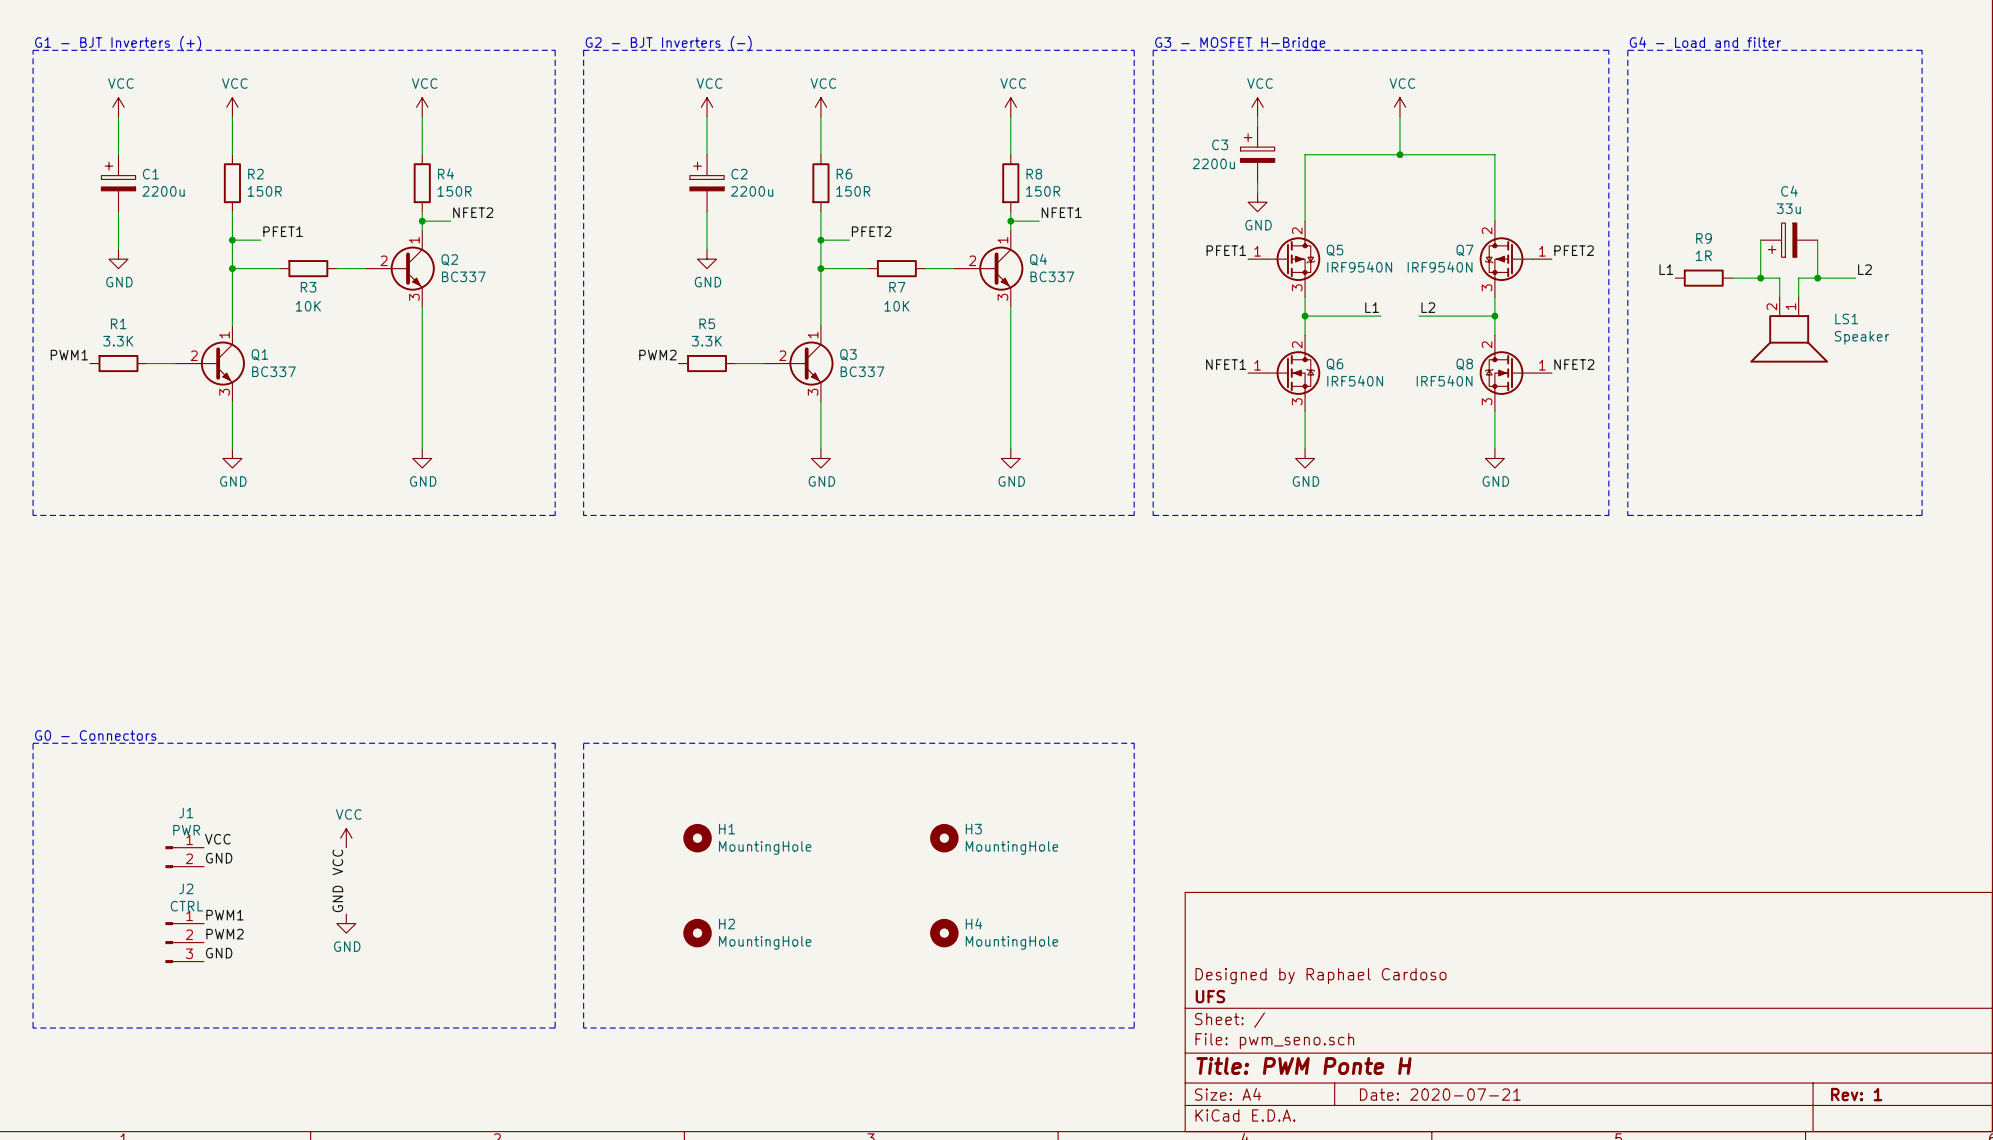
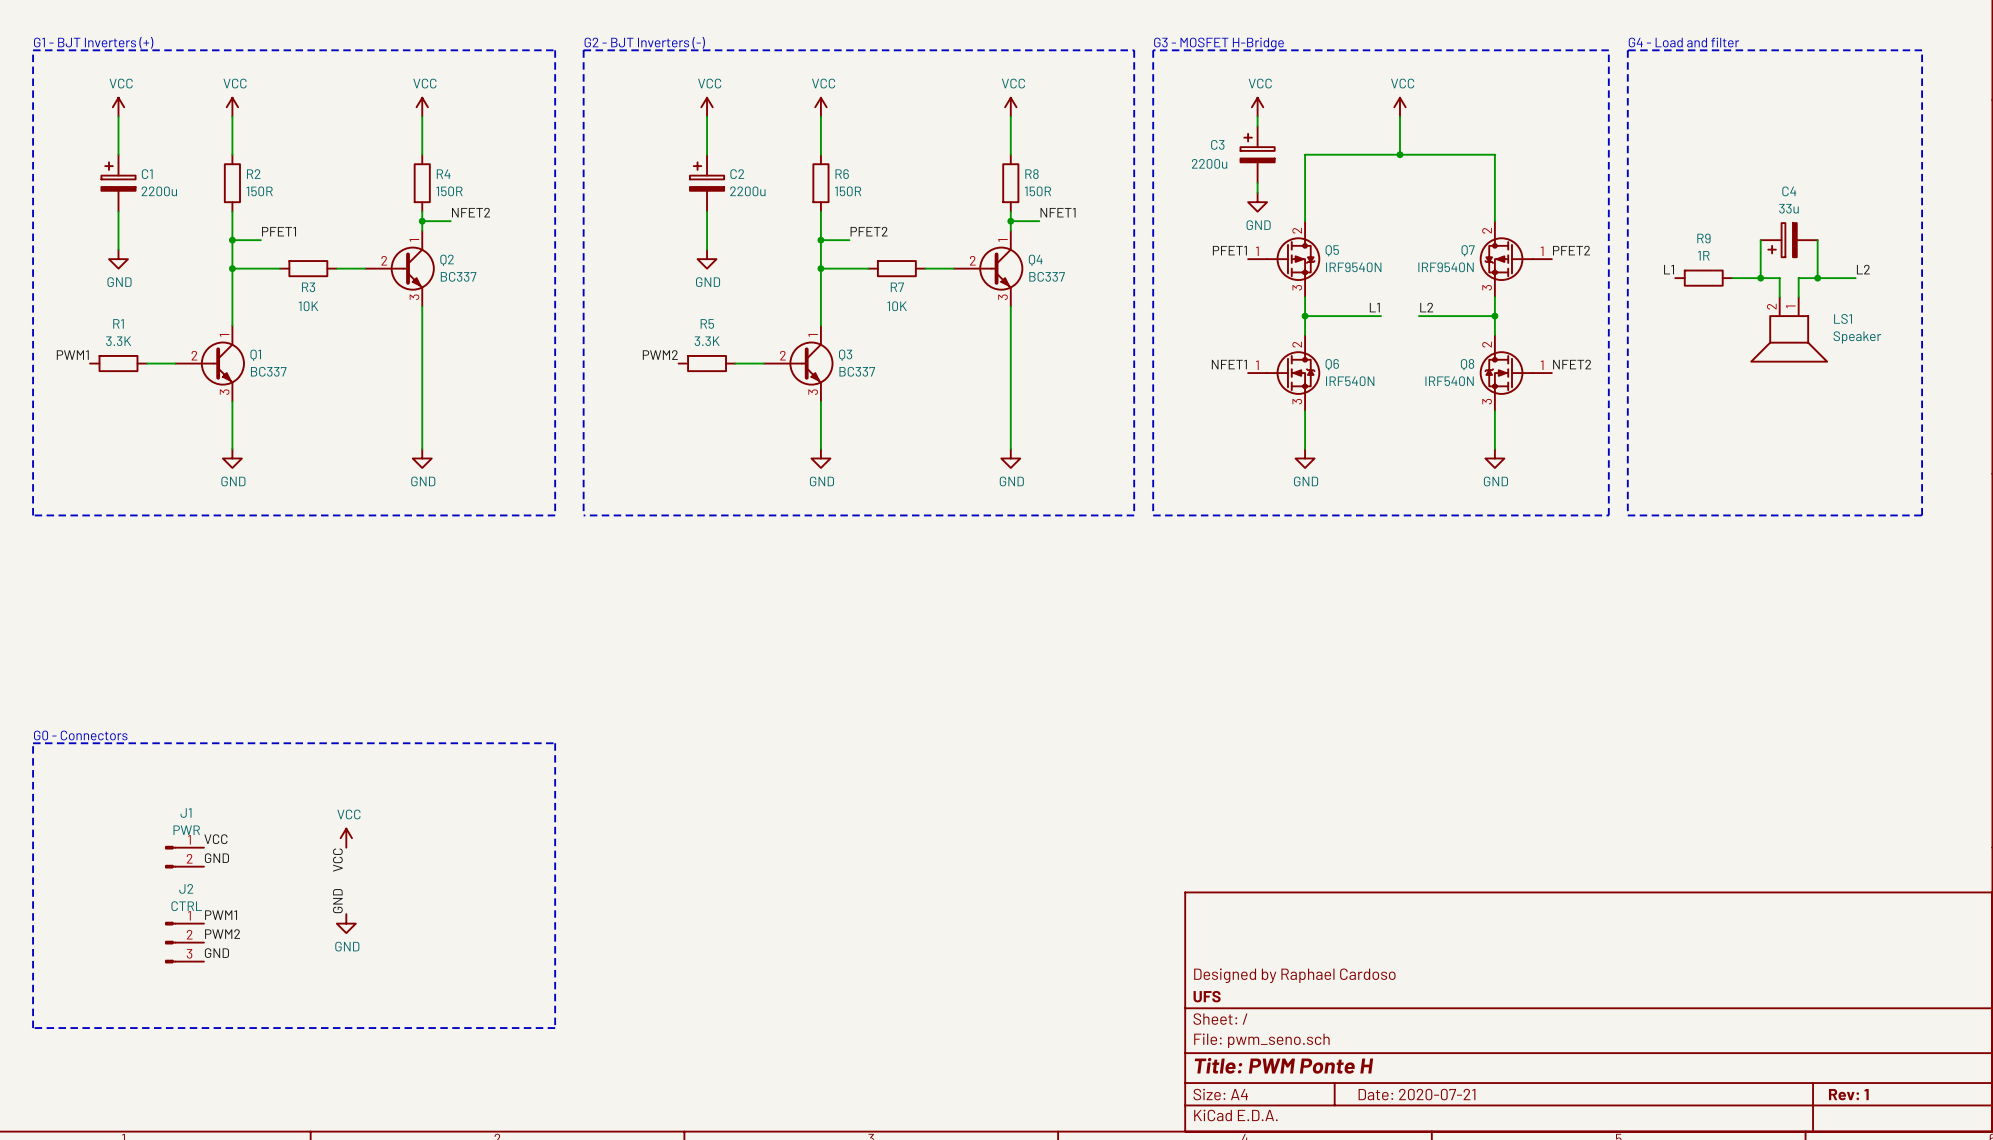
line: (583, 743) (1134, 743) (1134, 1028) (583, 1028) (583, 743) -> none
H1: MountingHole (697, 838) -> none
H3: MountingHole (944, 838) -> none
H2: MountingHole (697, 933) -> none
H4: MountingHole (944, 933) -> none

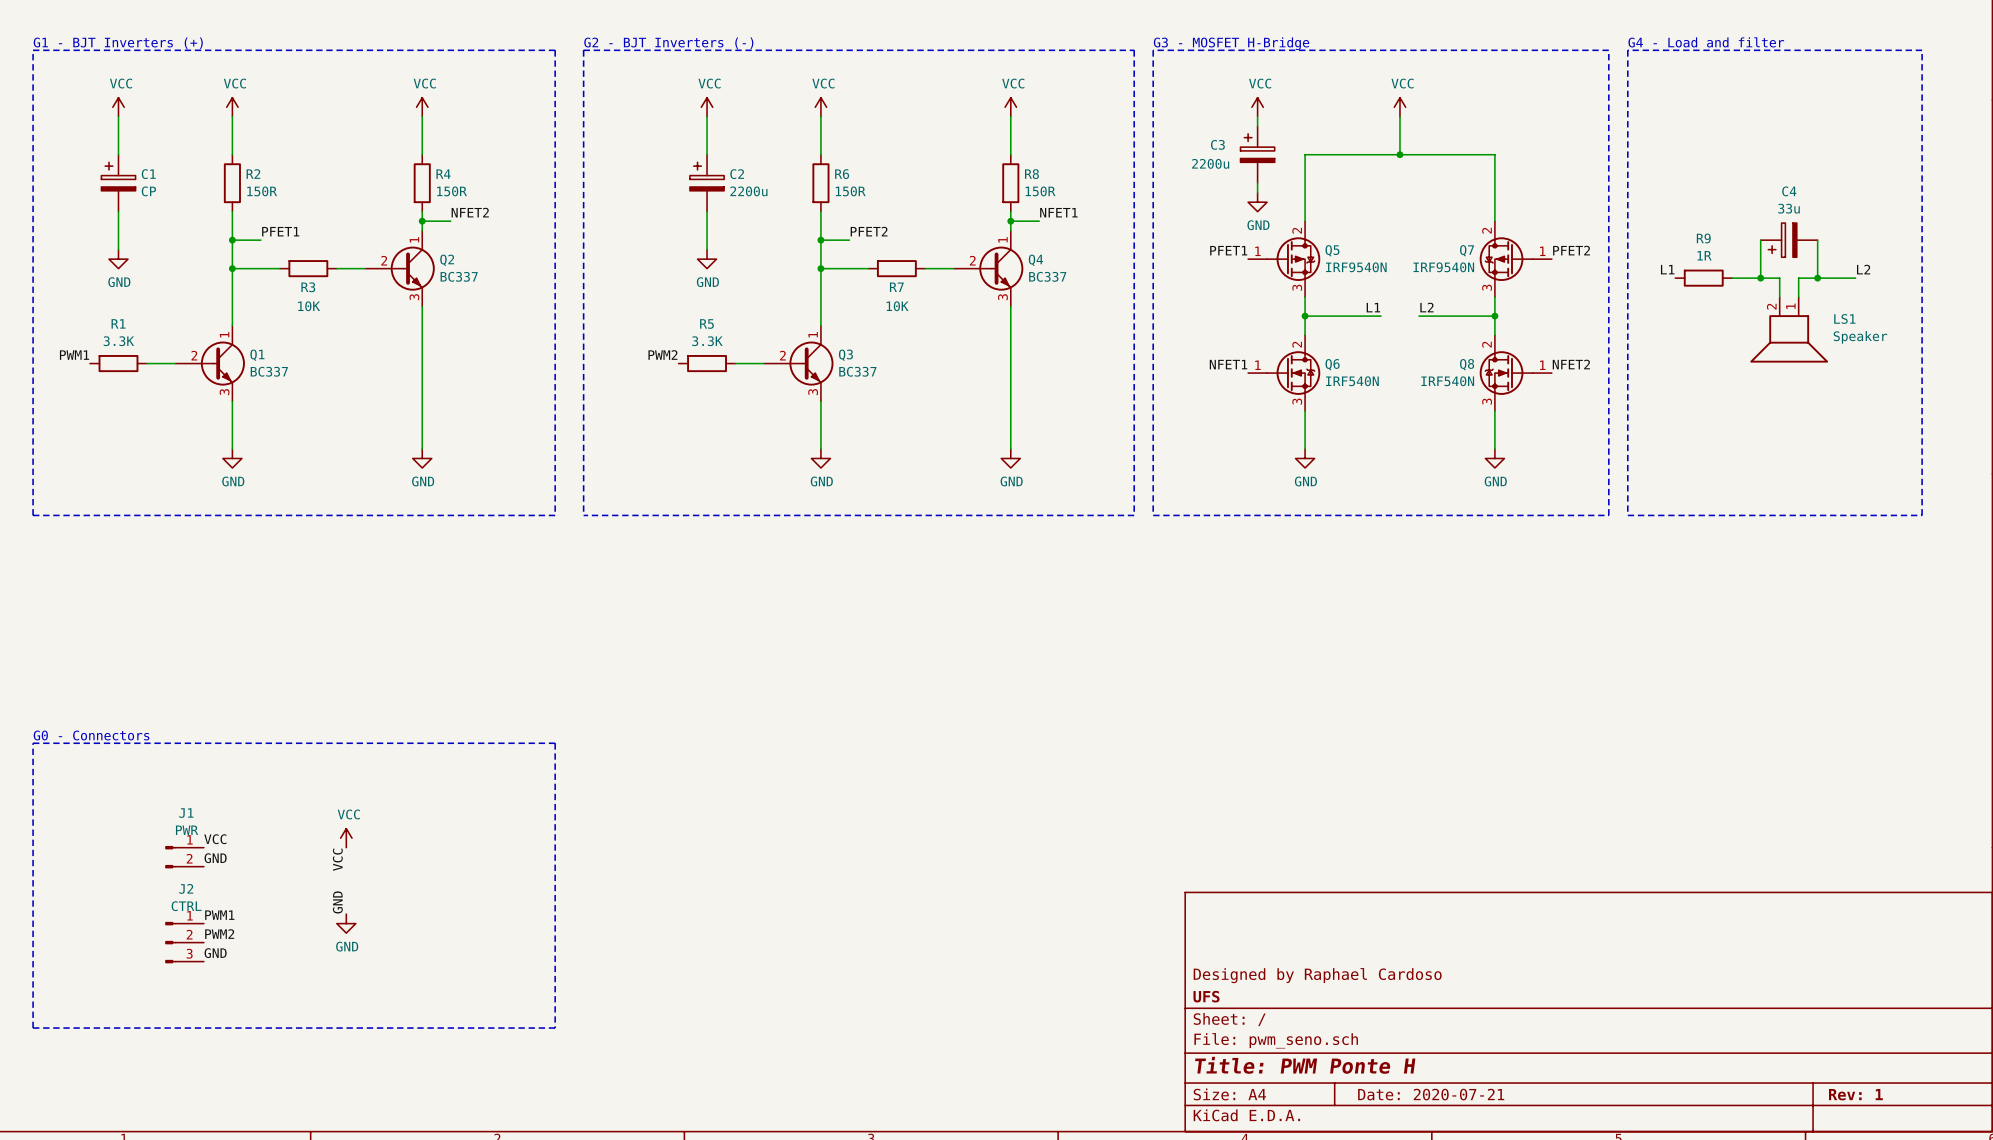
C1 value: 2200u (159, 191) -> CP (148, 191)

